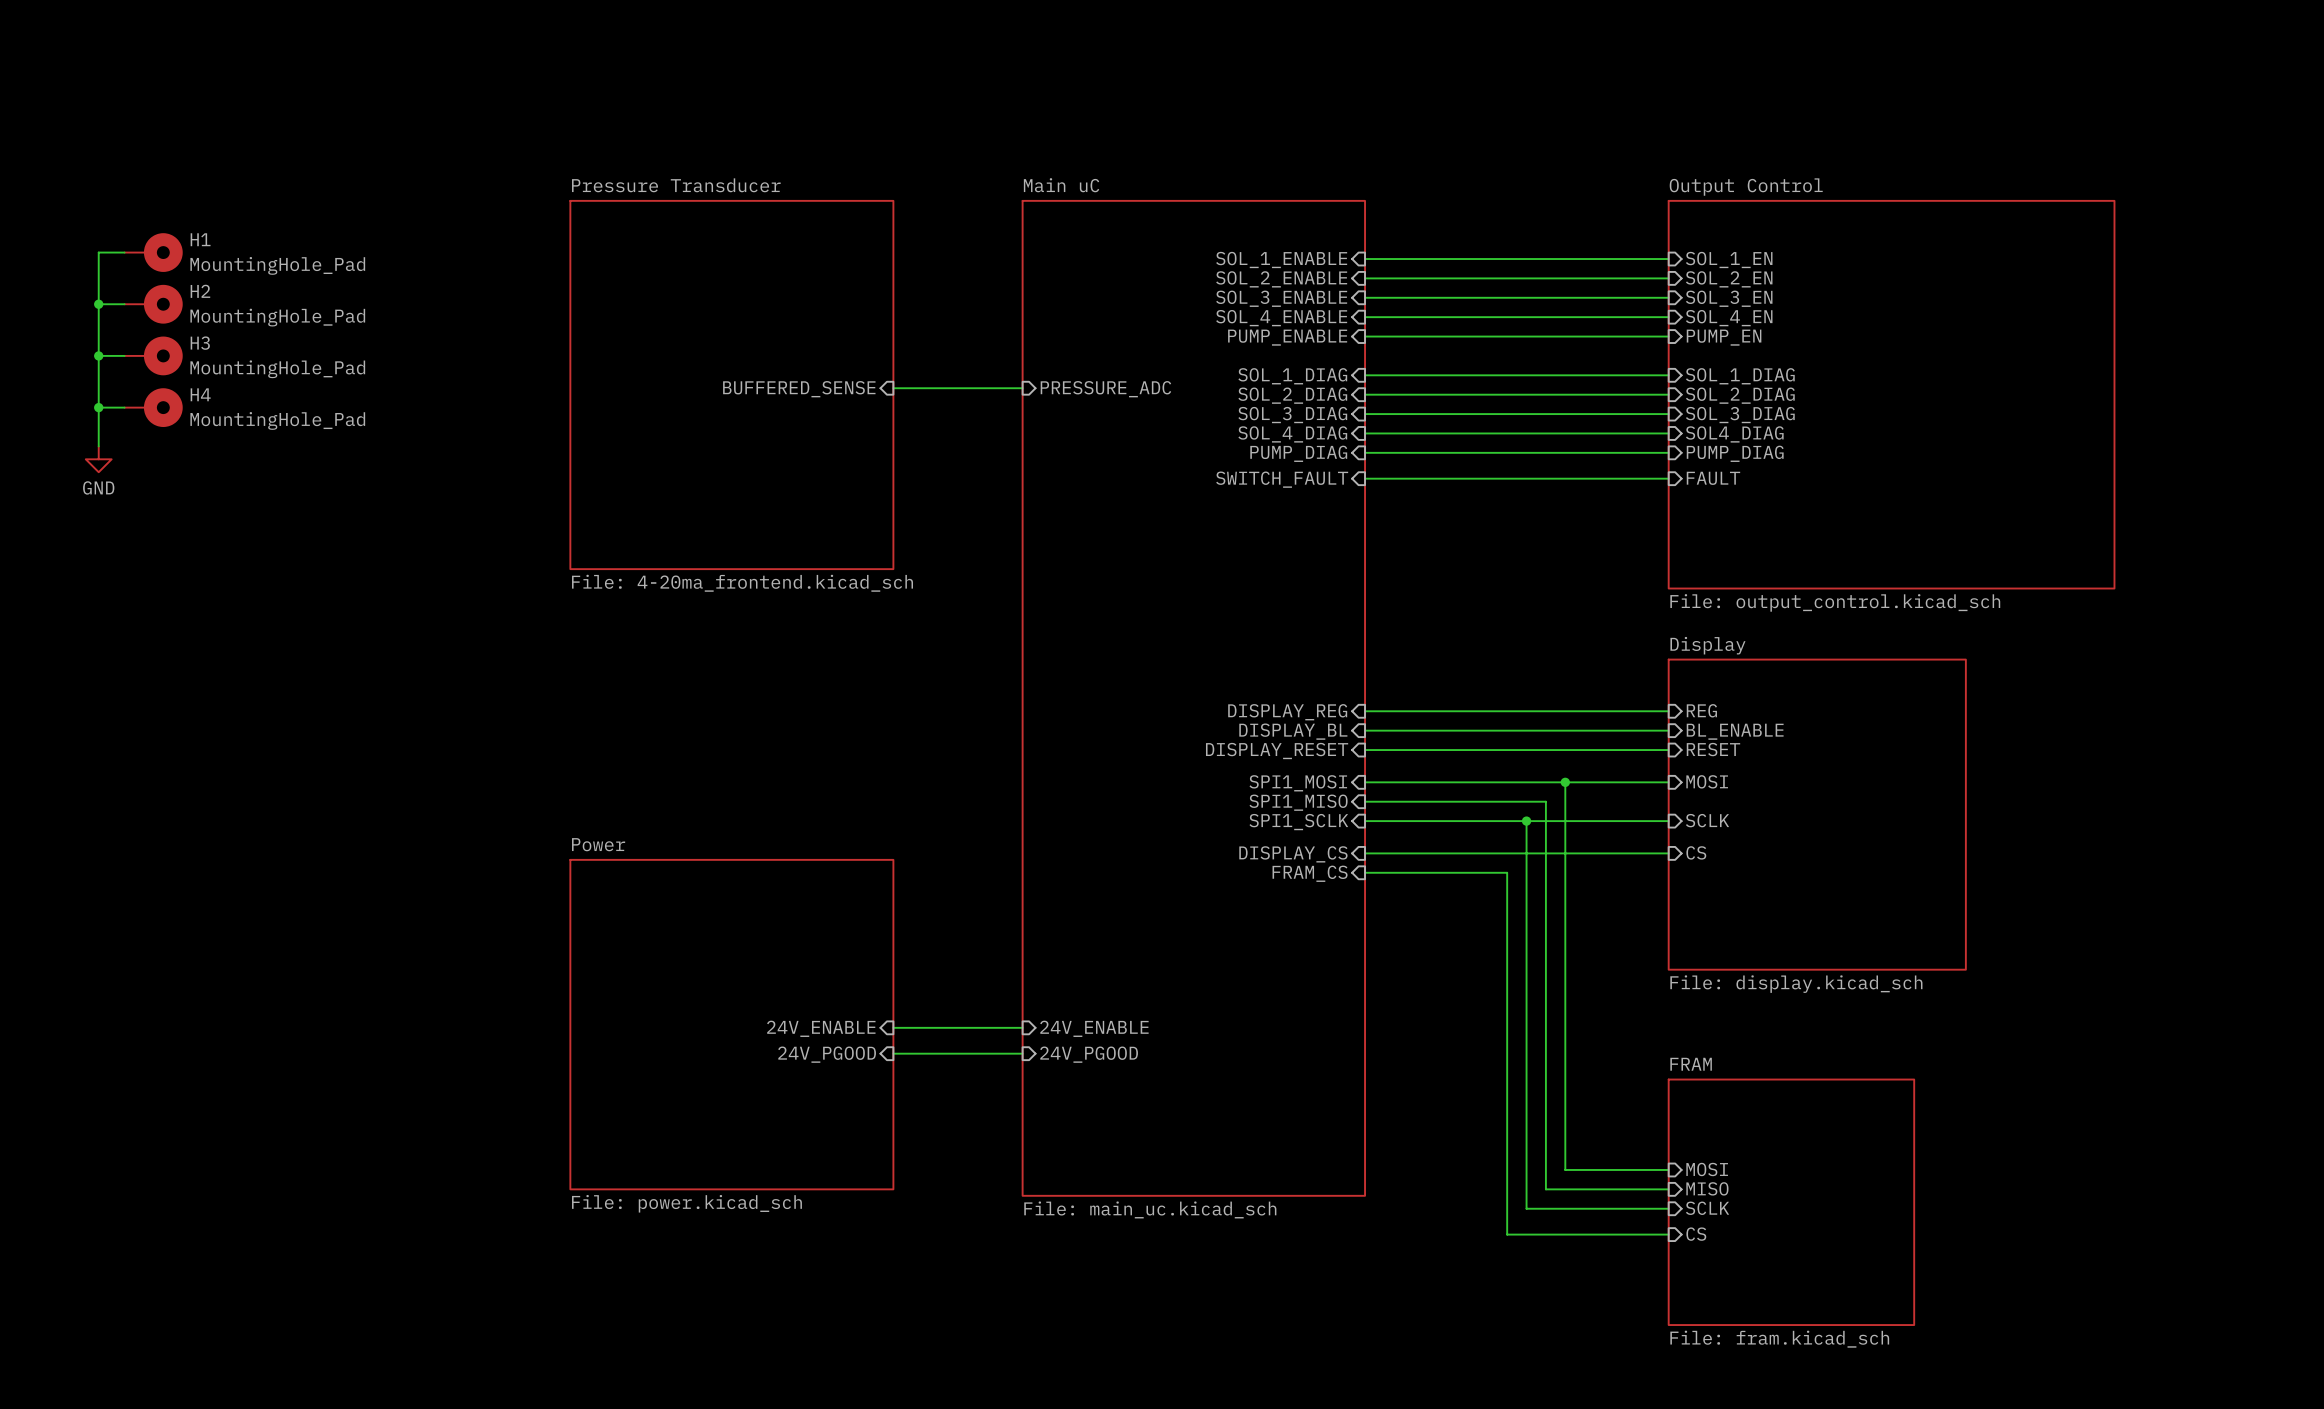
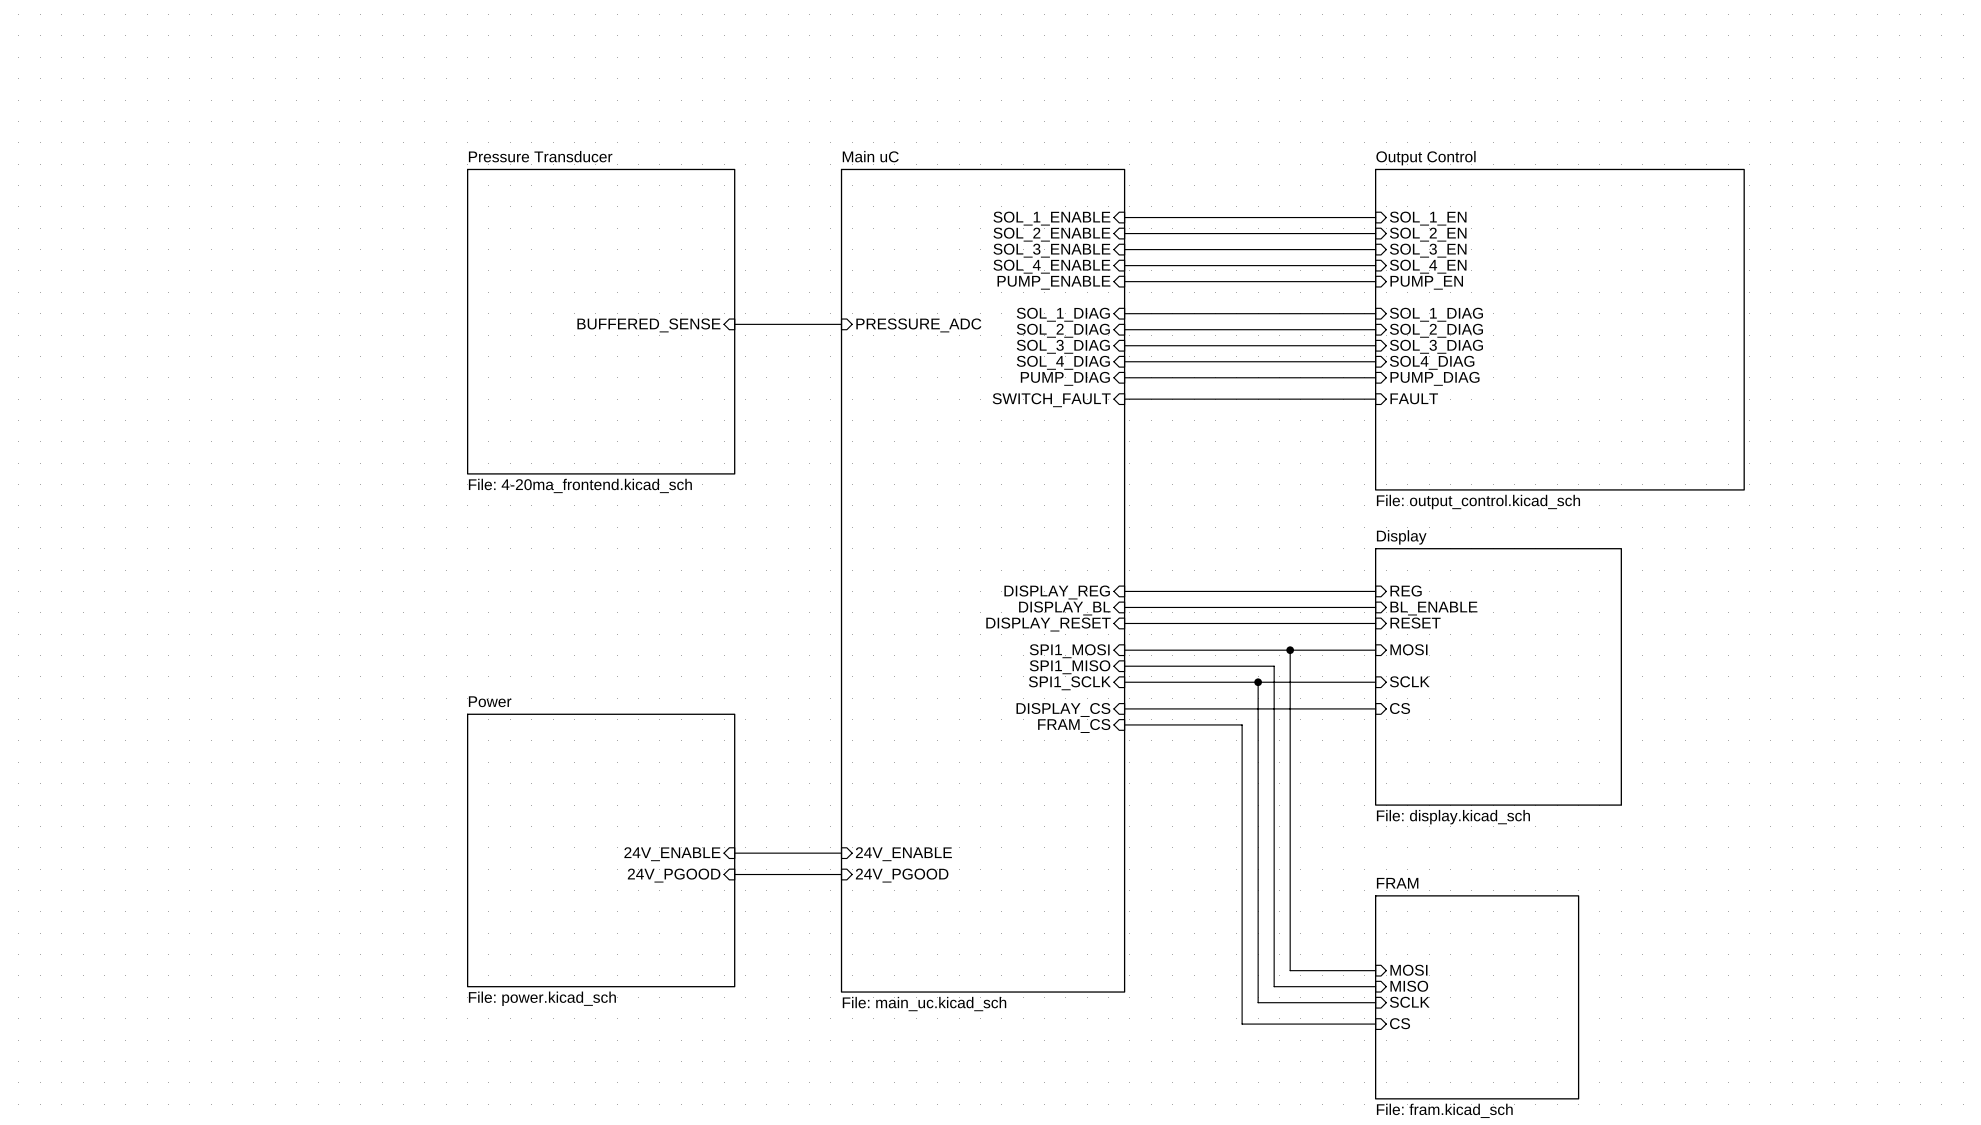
wire: (124, 252) (98, 252) (98, 446) -> none
H1: MountingHole_Pad (153, 252) -> none
wire: (98, 304) (124, 304) -> none
junction: (98, 304) -> none
H2: MountingHole_Pad (153, 304) -> none
wire: (98, 355) (124, 355) -> none
junction: (98, 355) -> none
H3: MountingHole_Pad (153, 355) -> none
wire: (98, 407) (124, 407) -> none
junction: (98, 407) -> none
H4: MountingHole_Pad (153, 407) -> none
power symbol: GND (98, 459) -> none

